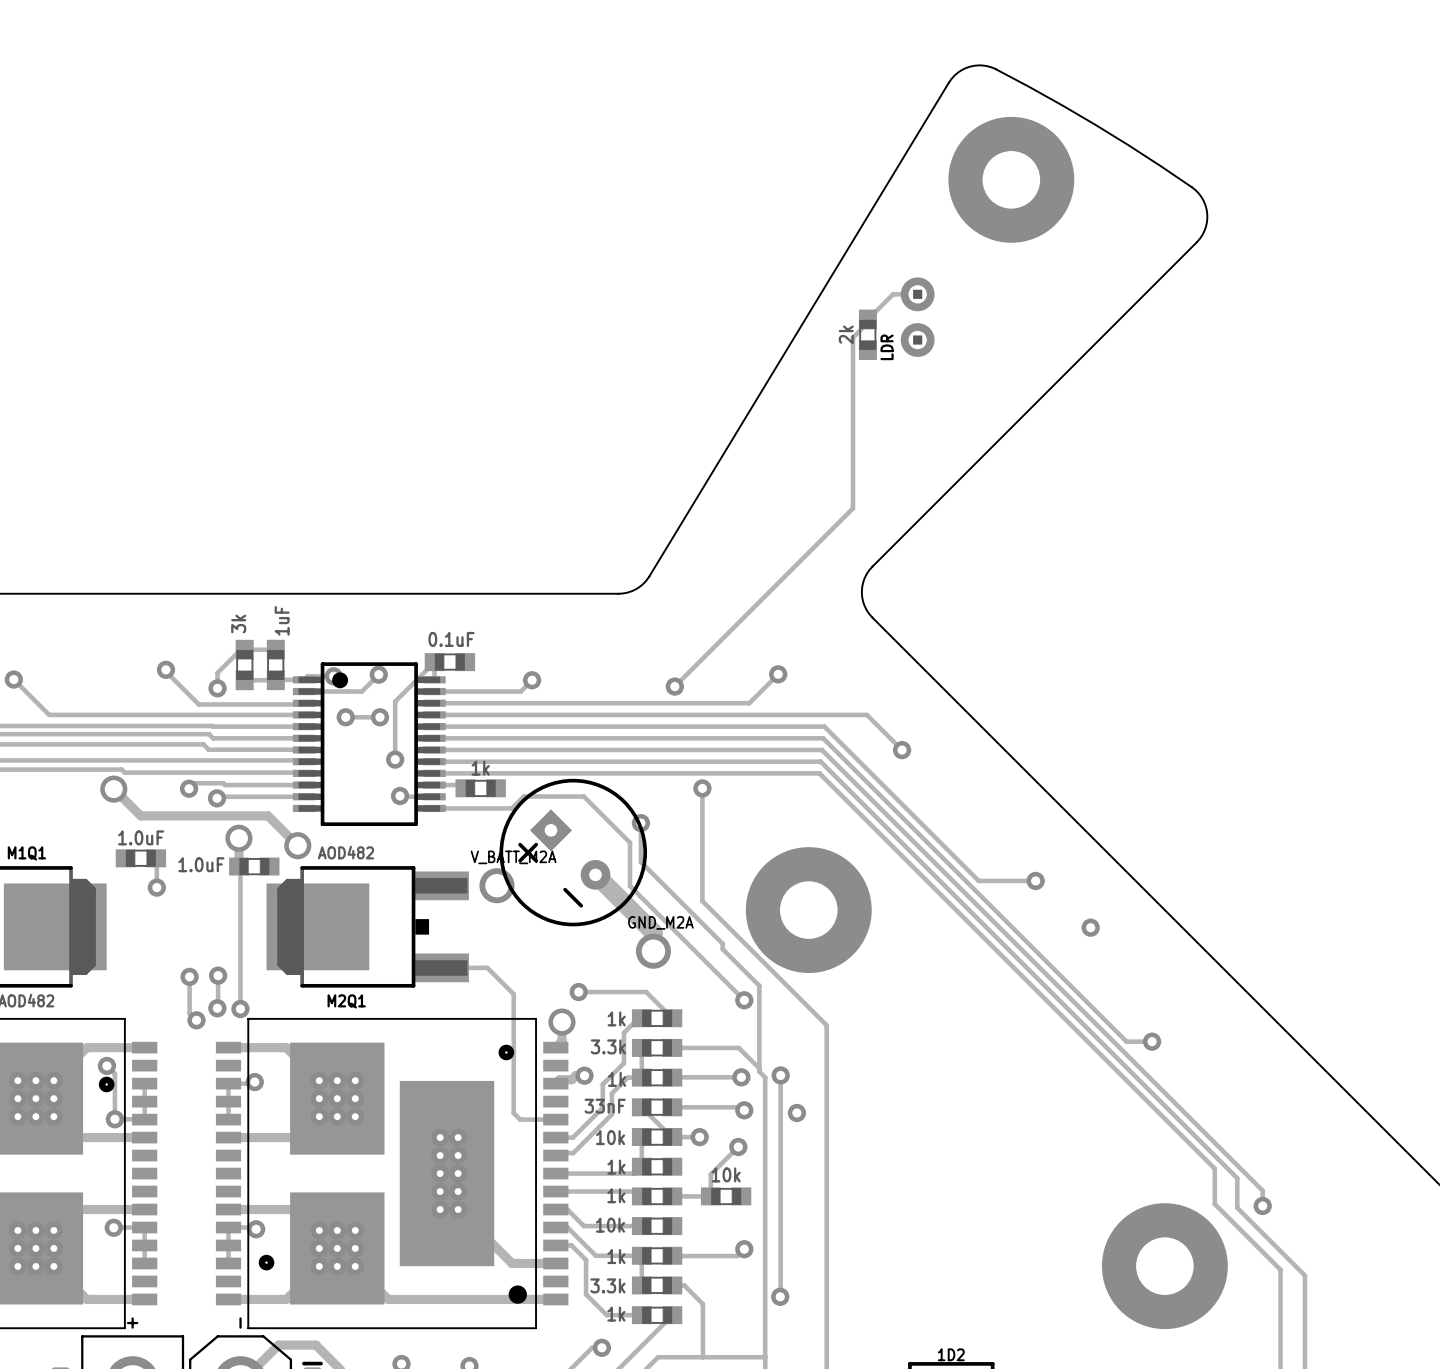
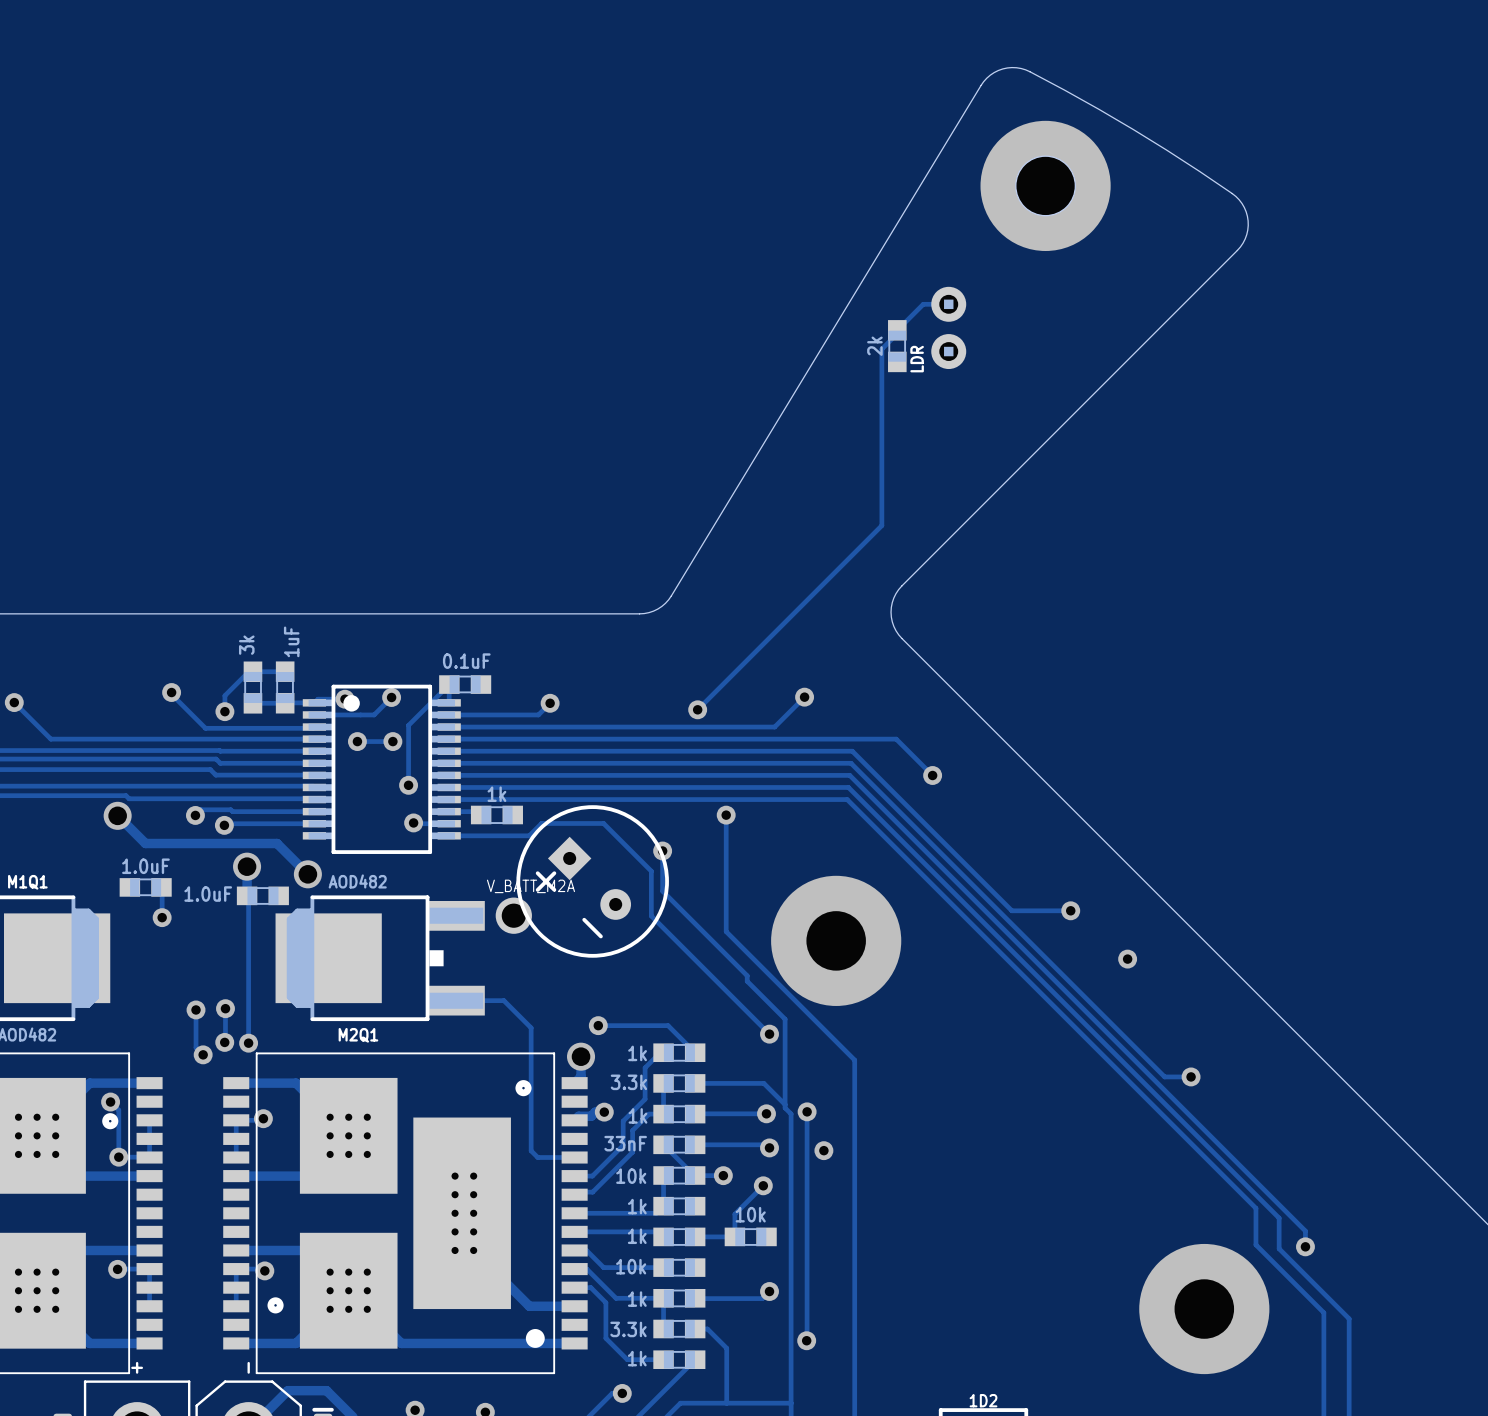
round board edge: none -> [1015, 156, 1076, 216]
track: (595, 874) (653, 932) (653, 951) -> none
GND_M2A: (653, 951) -> none

